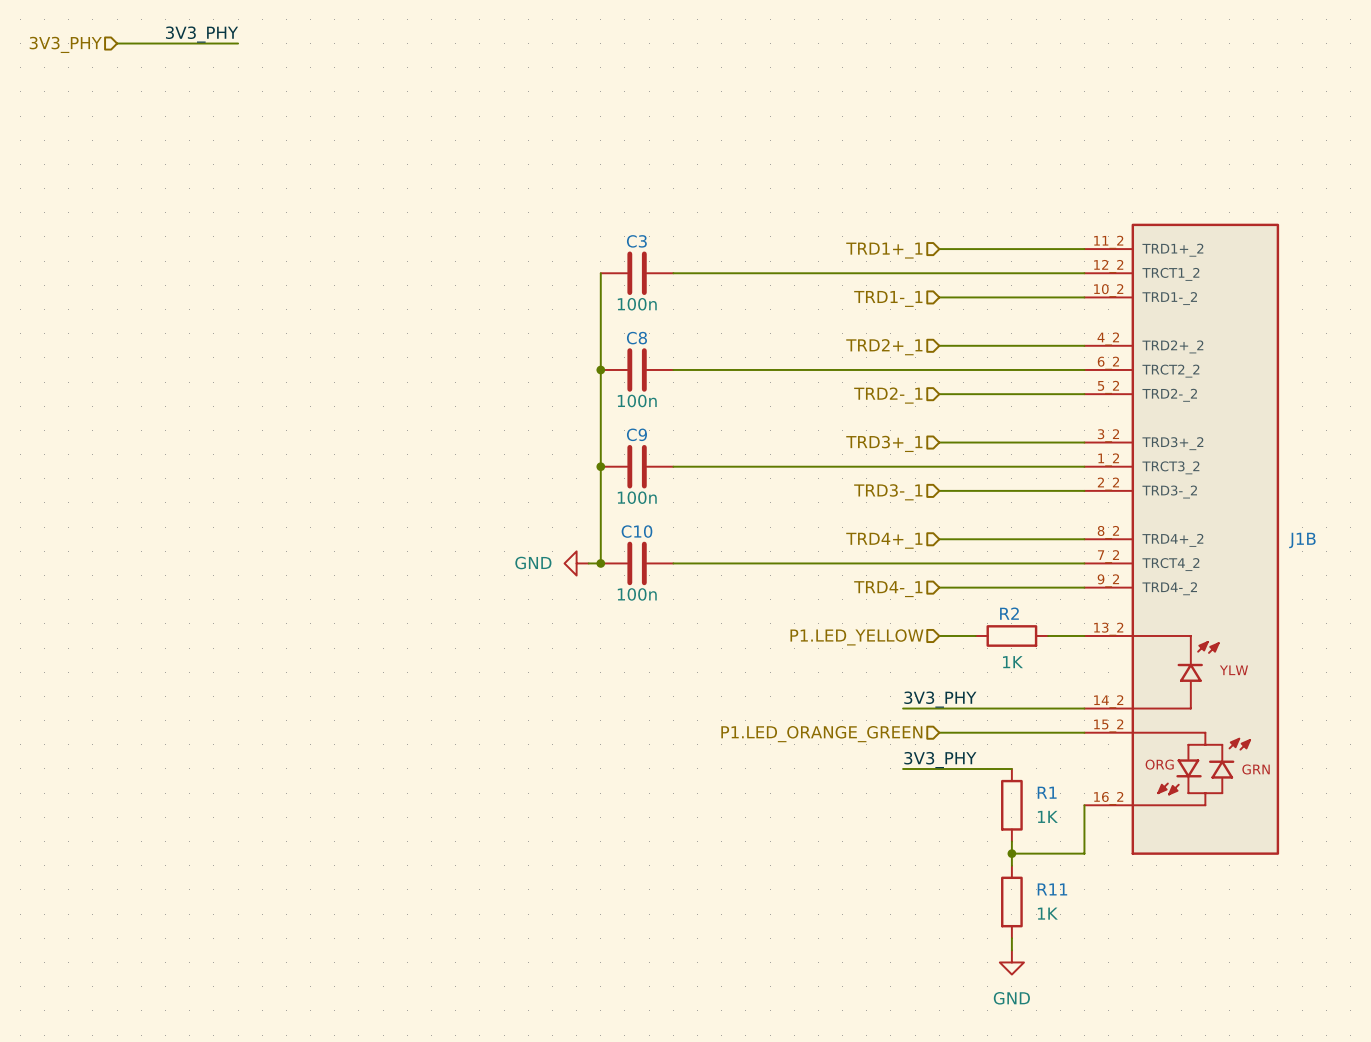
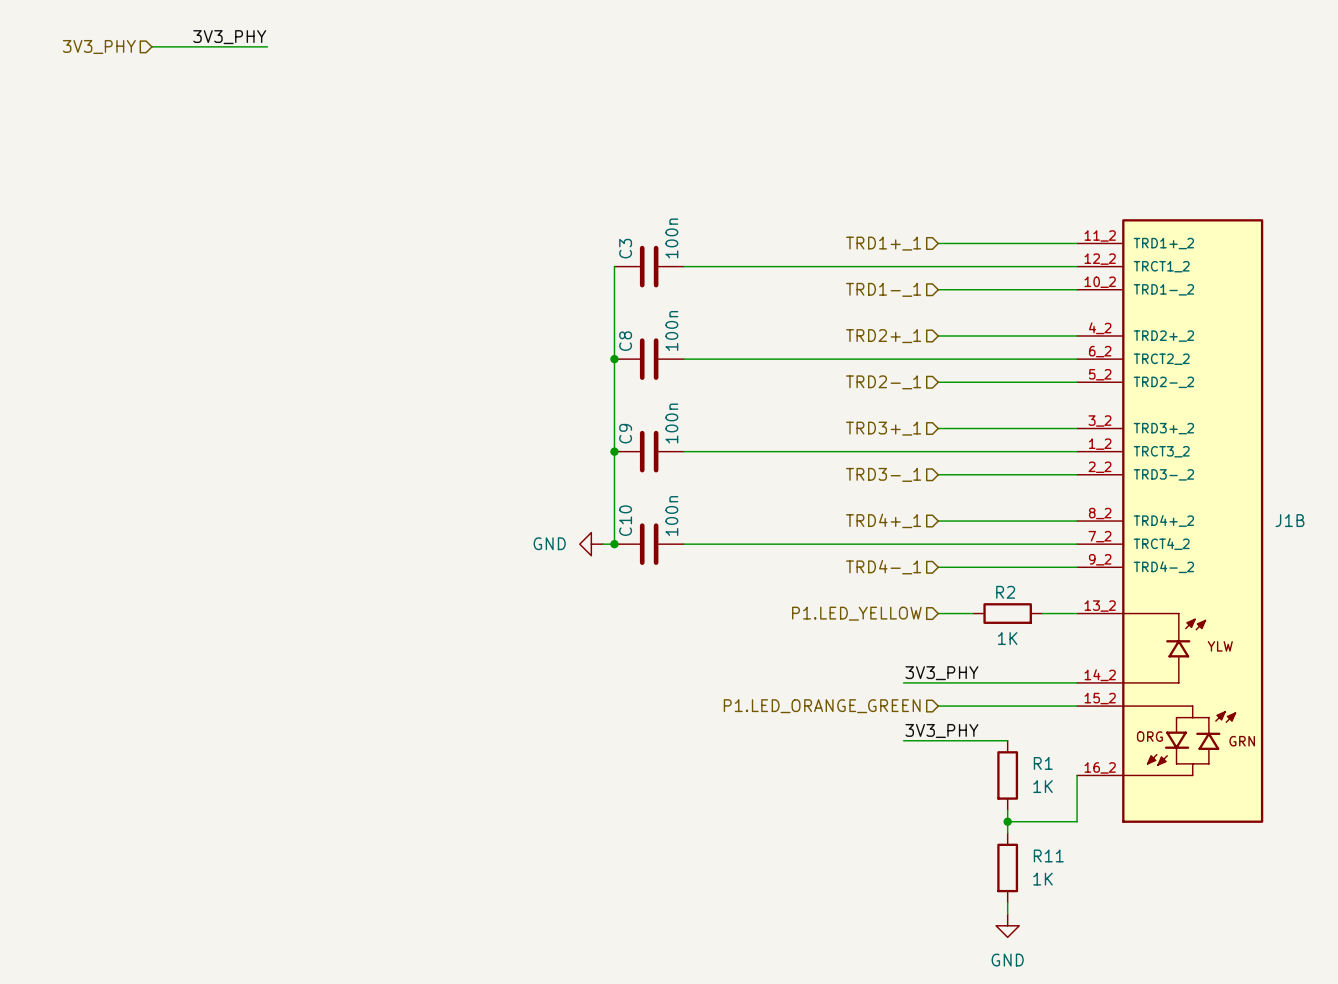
C3 name rotation: 0° (636, 241) -> 90° counterclockwise (625, 248)
C3 value rotation: 0° (637, 304) -> 90° counterclockwise (671, 238)
C3 value position: 100n (637, 304) -> 100n (671, 238)
C8 name rotation: 0° (636, 338) -> 90° counterclockwise (625, 341)
C8 value rotation: 0° (637, 400) -> 90° counterclockwise (671, 330)
C8 value position: 100n (637, 400) -> 100n (671, 330)
C9 name rotation: 0° (636, 434) -> 90° counterclockwise (625, 433)
C9 value rotation: 0° (637, 497) -> 90° counterclockwise (671, 423)
C9 value position: 100n (637, 497) -> 100n (671, 423)
C10 name rotation: 0° (636, 531) -> 90° counterclockwise (625, 520)
C10 value rotation: 0° (637, 594) -> 90° counterclockwise (671, 515)
C10 value position: 100n (637, 594) -> 100n (671, 515)

